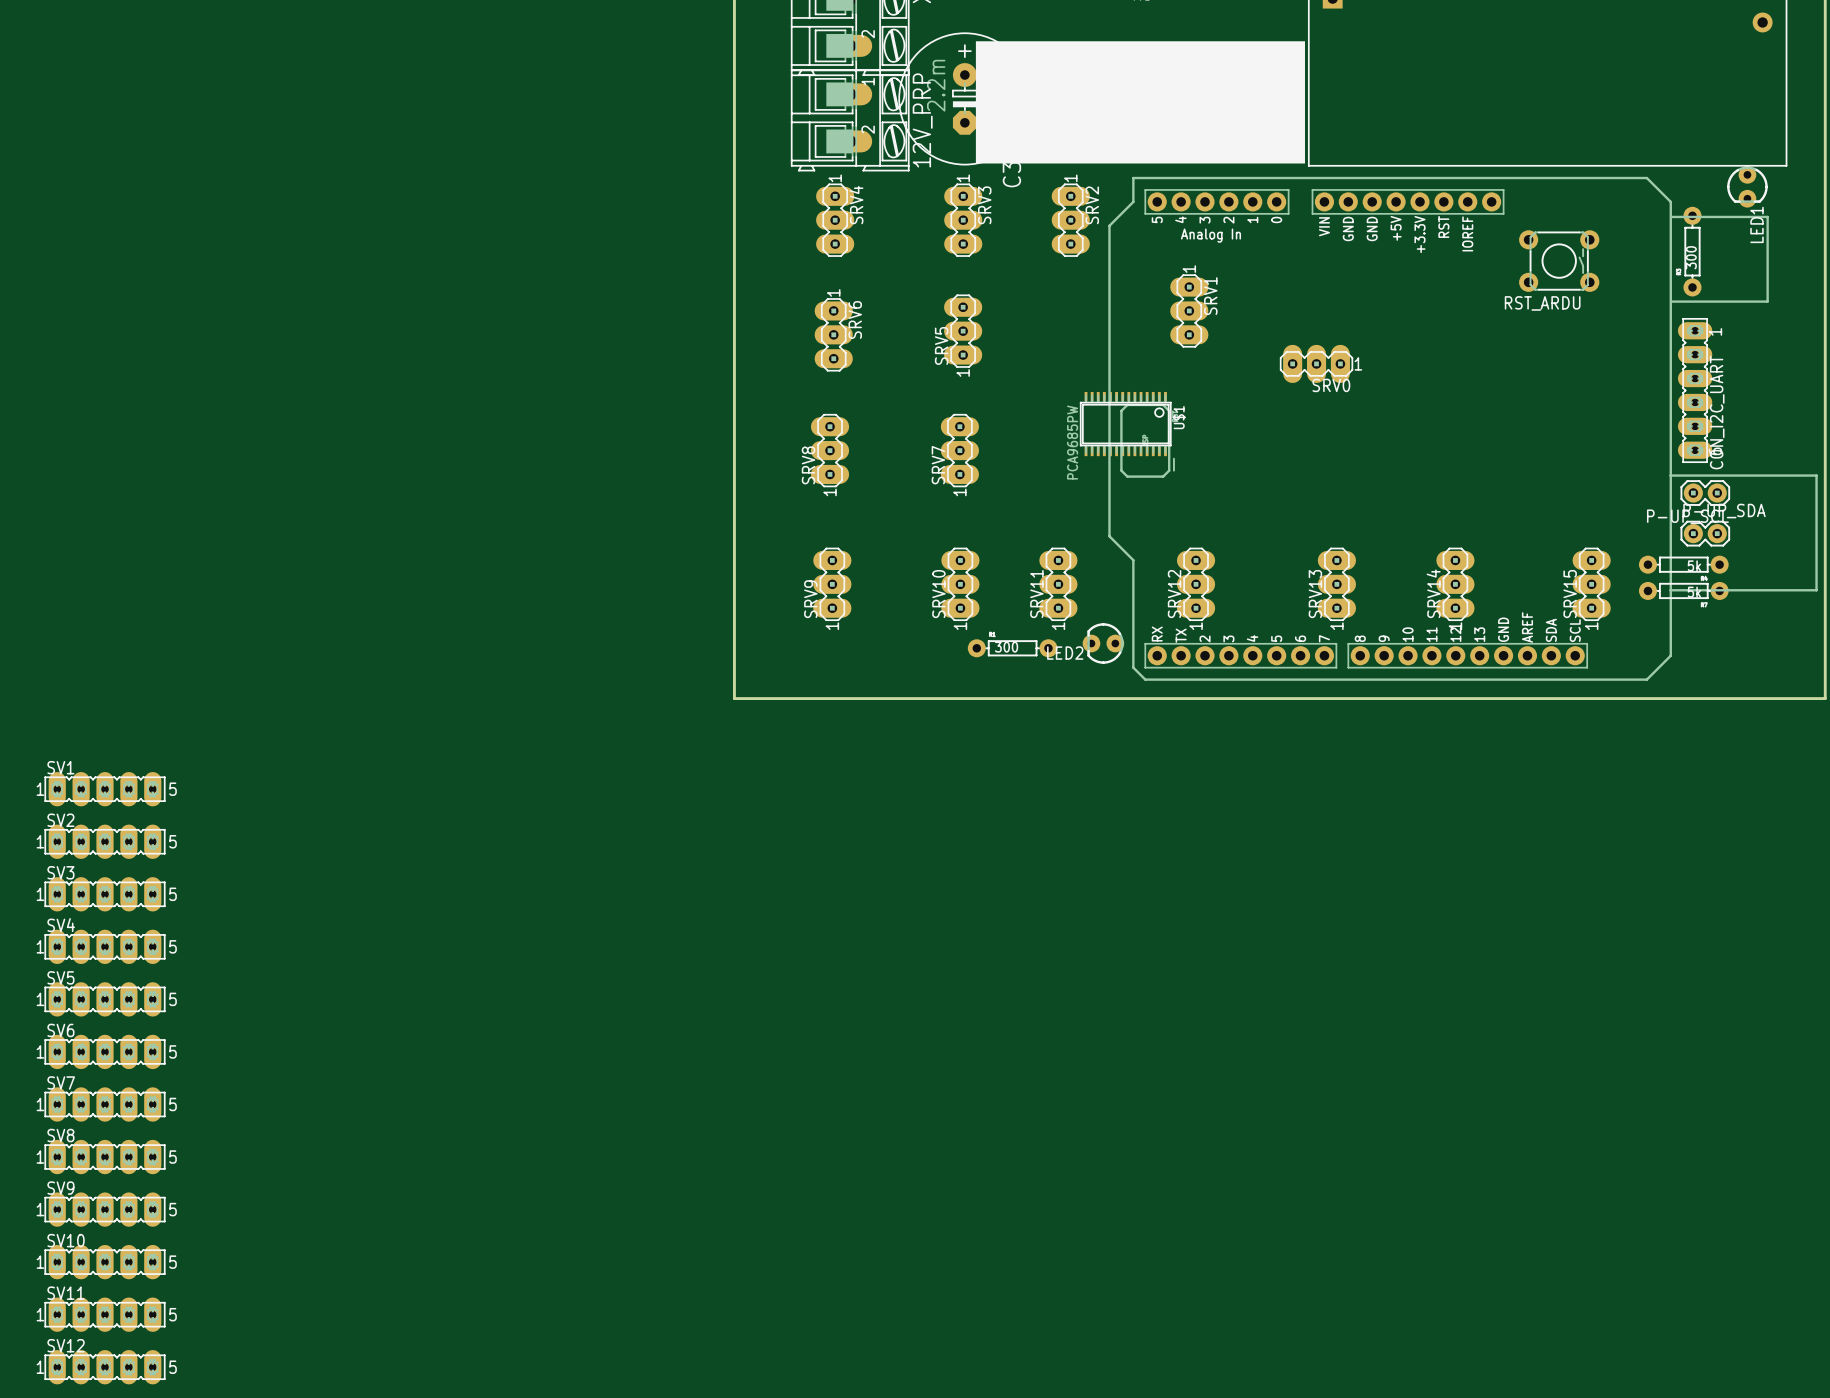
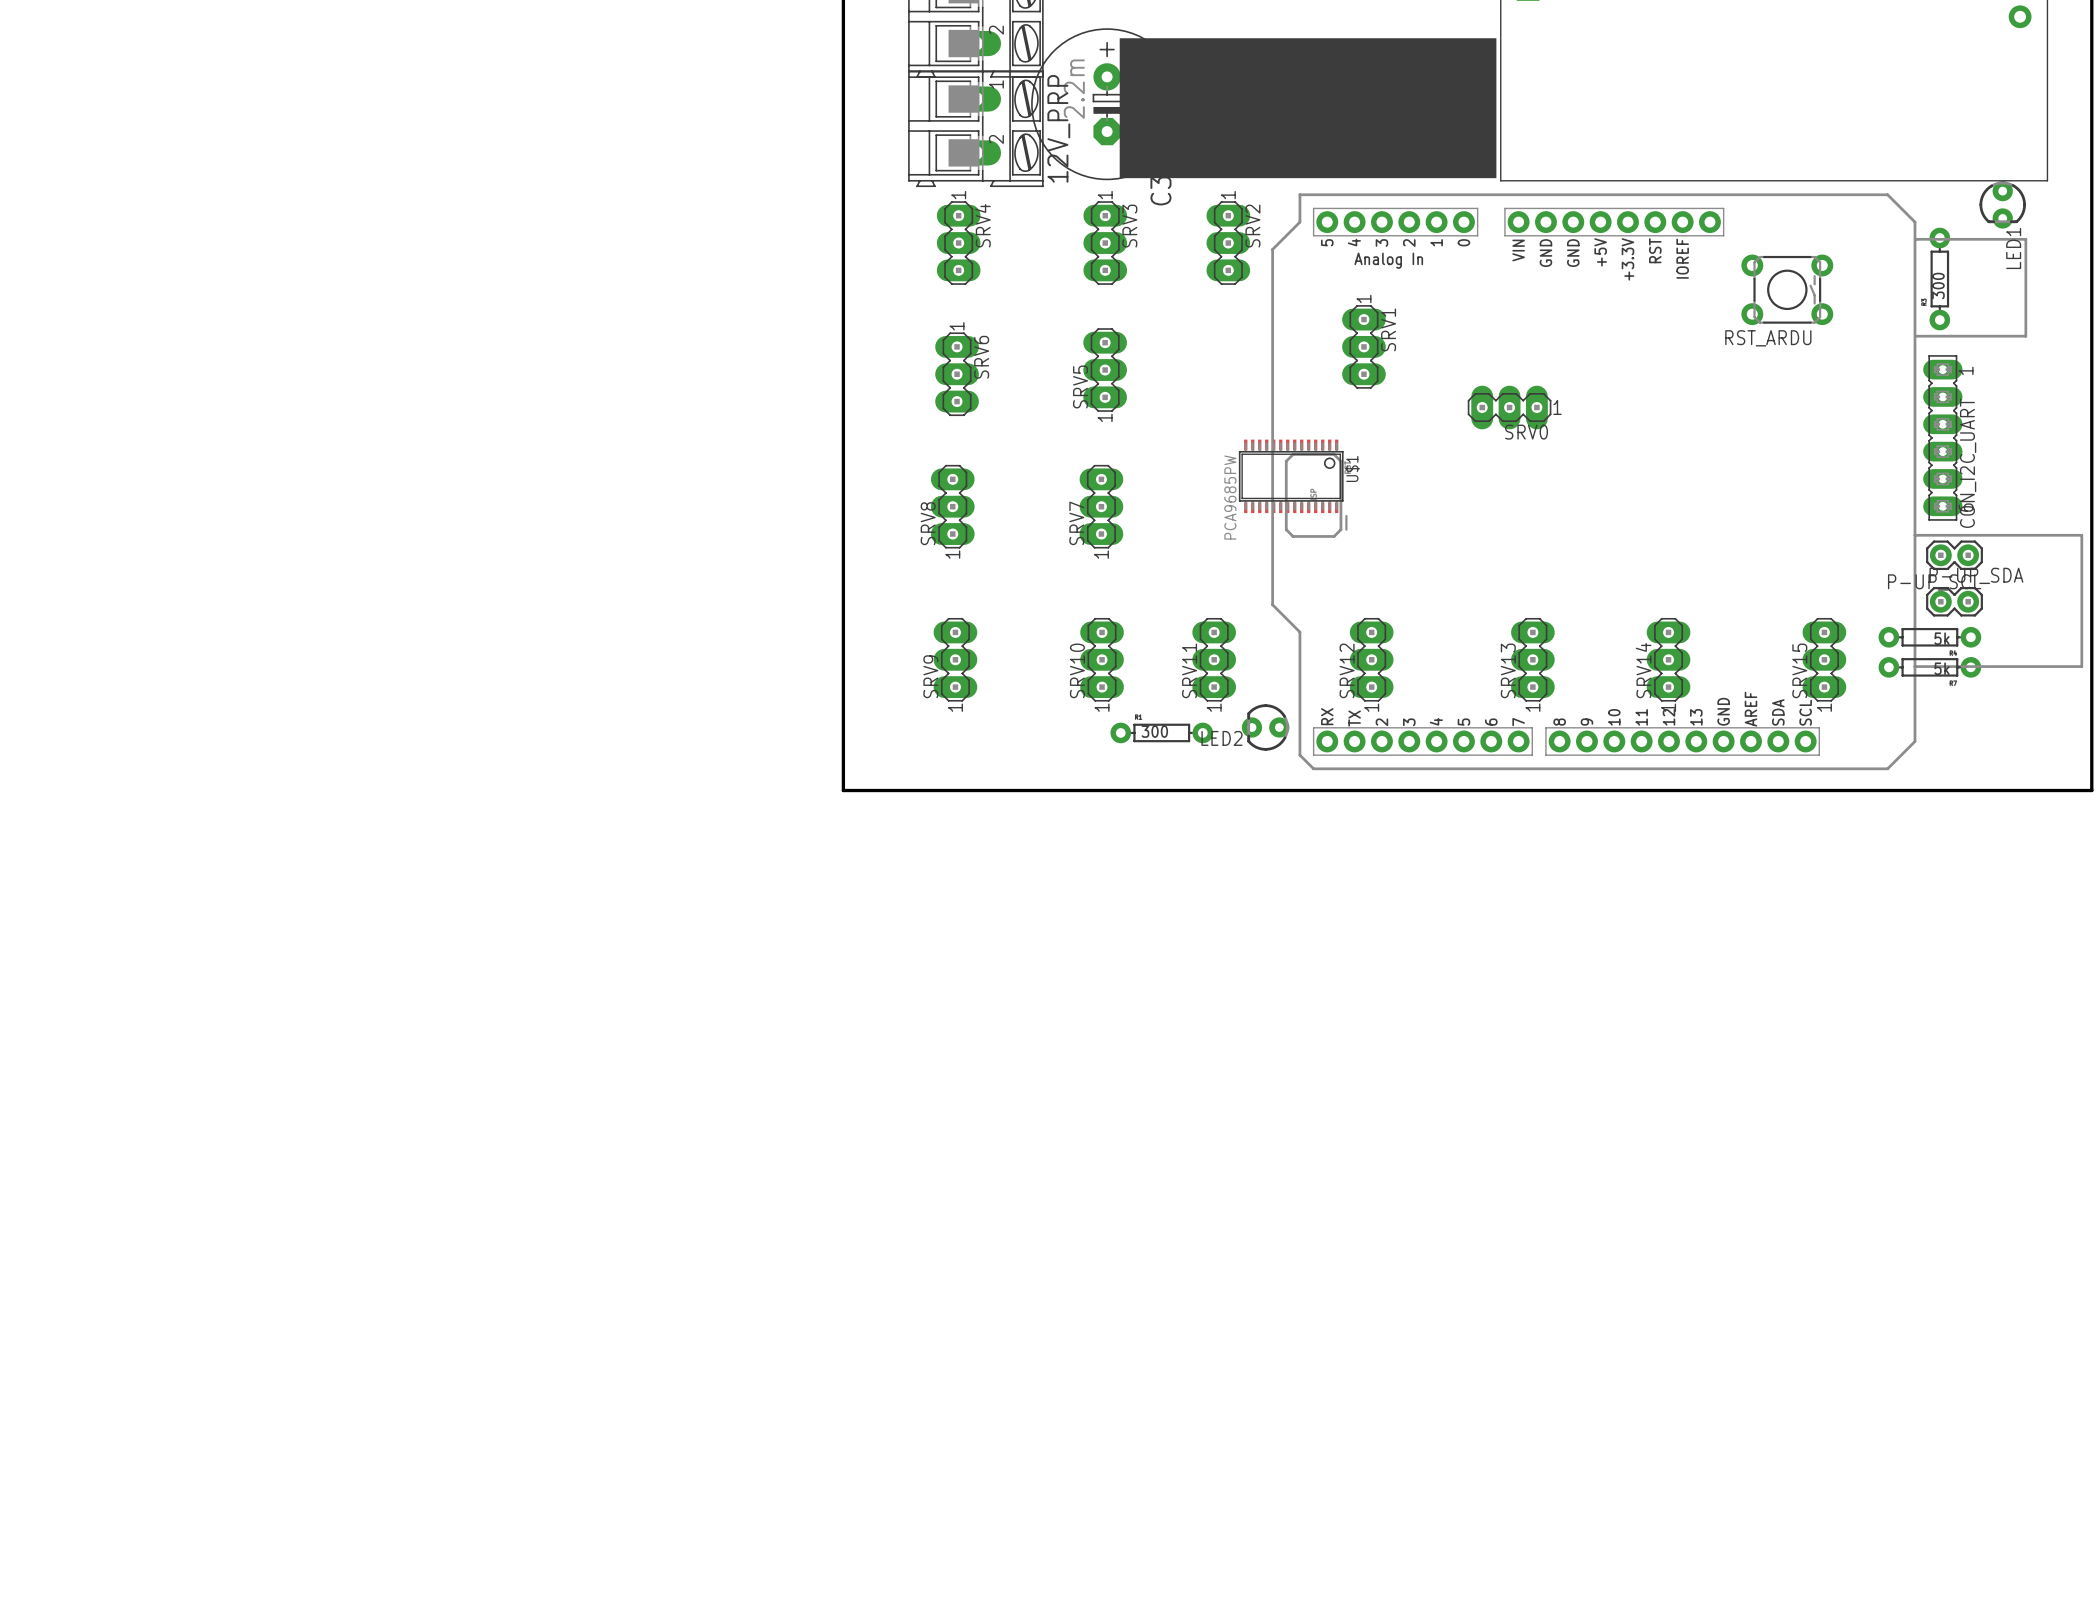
SV1: (105, 789) -> none
SV2: (105, 841) -> none
SV3: (105, 894) -> none
SV4: (105, 946) -> none
SV5: (105, 999) -> none
SV6: (105, 1051) -> none
SV7: (105, 1104) -> none
SV8: (105, 1157) -> none
SV9: (105, 1209) -> none
SV10: (105, 1262) -> none
SV11: (105, 1314) -> none
SV12: (105, 1367) -> none

